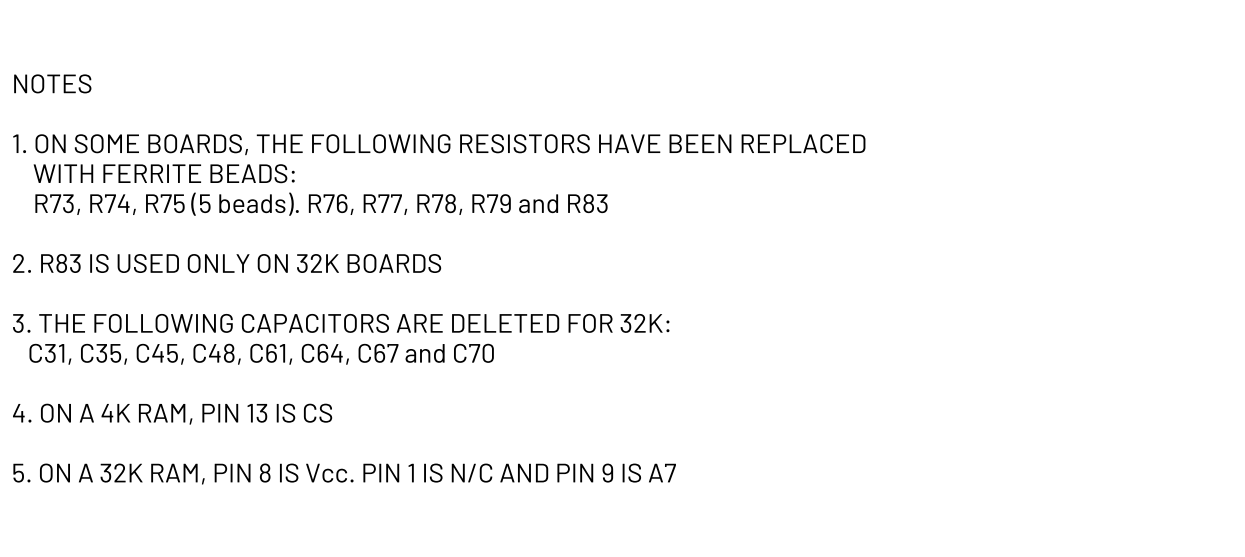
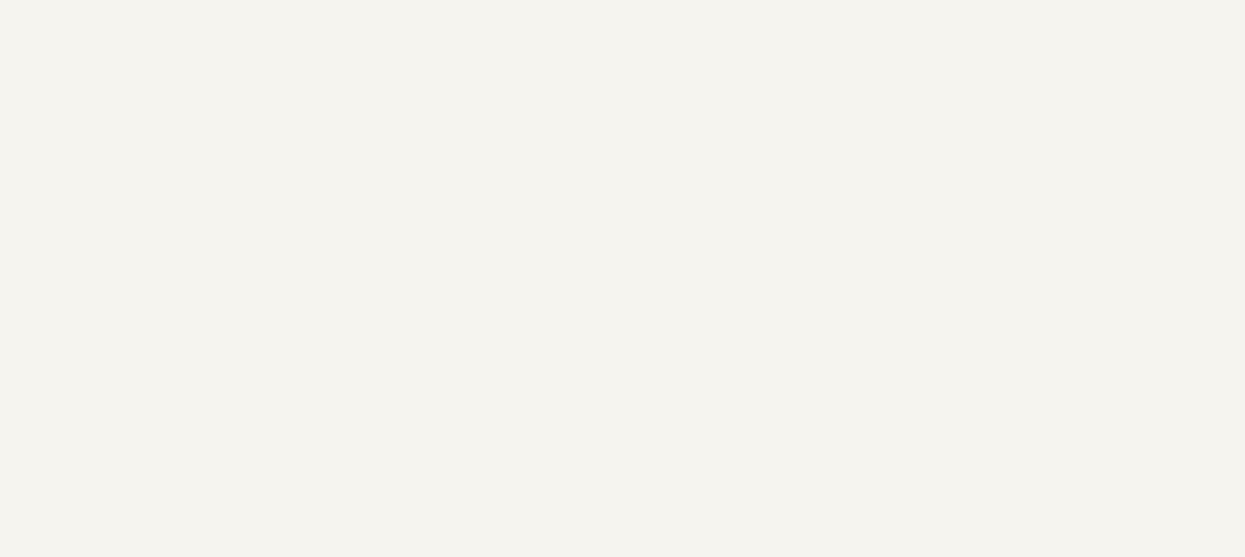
text: NOTES (52, 83) -> none
text: 1. ON SOME BOARDS, THE FOLLOWING RESISTORS HAVE BEEN REPLACED (439, 144) -> none
text: WITH FERRITE BEADS: (164, 173) -> none
text: R73, R74, R75 (5 beads). R76, R77, R78, R79 and R83 (321, 204) -> none
text: 2. R83 IS USED ONLY ON 32K BOARDS (227, 263) -> none
text: 3. THE FOLLOWING CAPACITORS ARE DELETED FOR 32K: (341, 323) -> none
text: C31, C35, C45, C48, C61, C64, C67 and C70 (261, 354) -> none
text: 4. ON A 4K RAM, PIN 13 IS CS (172, 414) -> none
text: 5. ON A 32K RAM, PIN 8 IS Vcc. PIN 1 IS N/C AND PIN 9 IS A7 (344, 474) -> none

